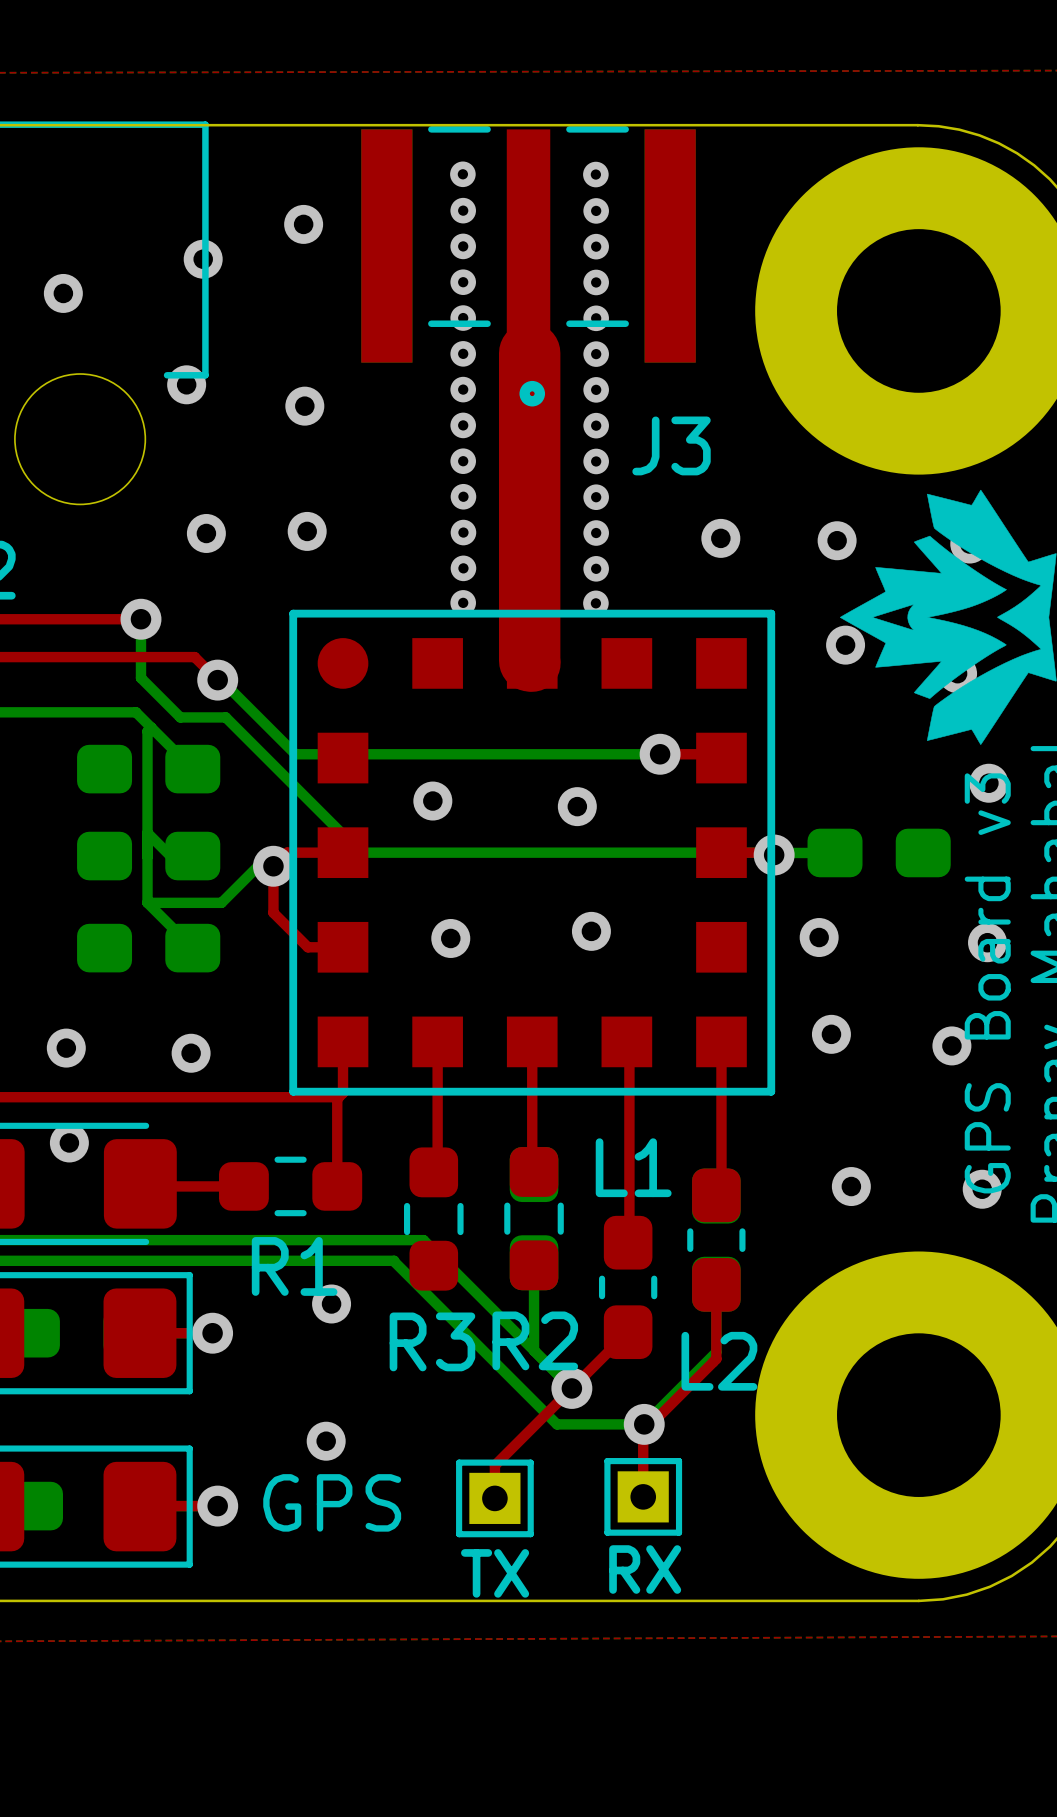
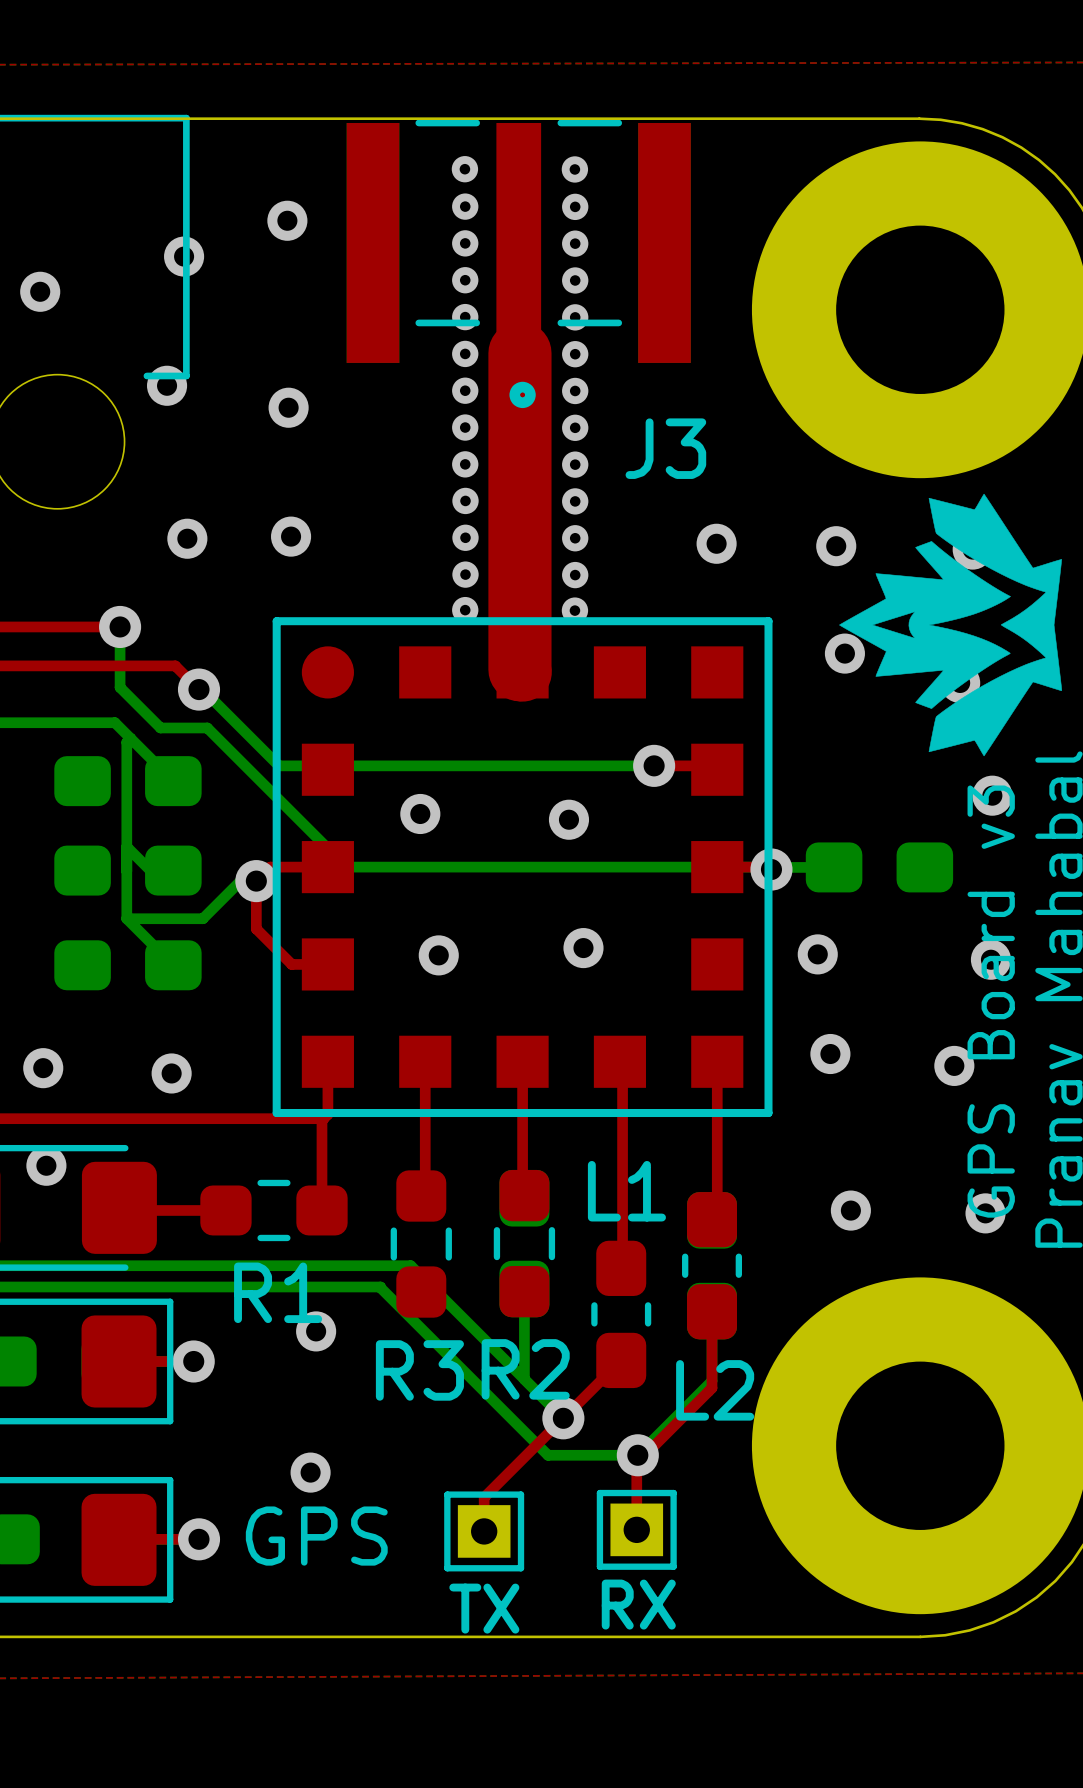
via position: (462, 174) -> (464, 169)
via position: (595, 174) -> (574, 169)
via position: (463, 210) -> (465, 206)
via position: (596, 210) -> (575, 206)
via position: (463, 246) -> (465, 243)
via position: (596, 246) -> (575, 243)
via position: (463, 282) -> (465, 280)
via position: (596, 282) -> (575, 280)
via position: (463, 318) -> (465, 317)
via position: (596, 318) -> (575, 317)
via position: (463, 353) -> (465, 353)
via position: (596, 354) -> (575, 354)
via position: (463, 389) -> (465, 390)
via position: (596, 389) -> (575, 390)
via position: (463, 425) -> (465, 427)
via position: (596, 425) -> (575, 427)
via position: (463, 461) -> (465, 464)
via position: (596, 461) -> (575, 464)
via position: (463, 496) -> (465, 500)
via position: (596, 497) -> (575, 501)
via position: (463, 532) -> (465, 537)
via position: (596, 533) -> (575, 538)
via position: (463, 568) -> (465, 574)
via position: (596, 568) -> (575, 575)
via position: (463, 602) -> (465, 610)
via position: (595, 603) -> (574, 610)

